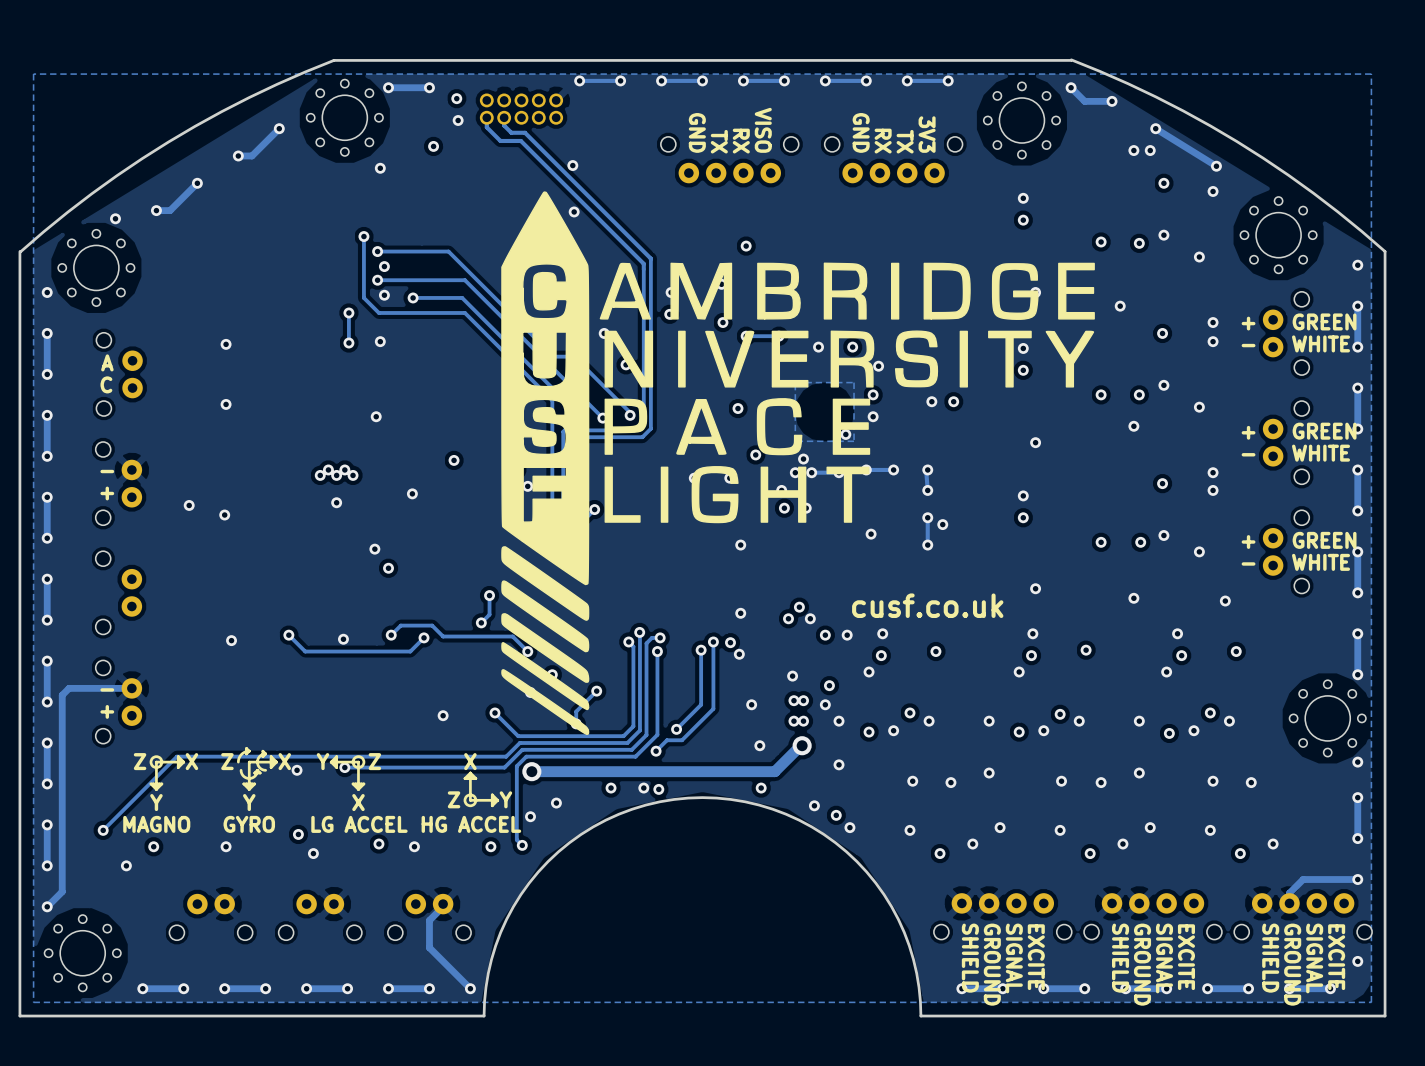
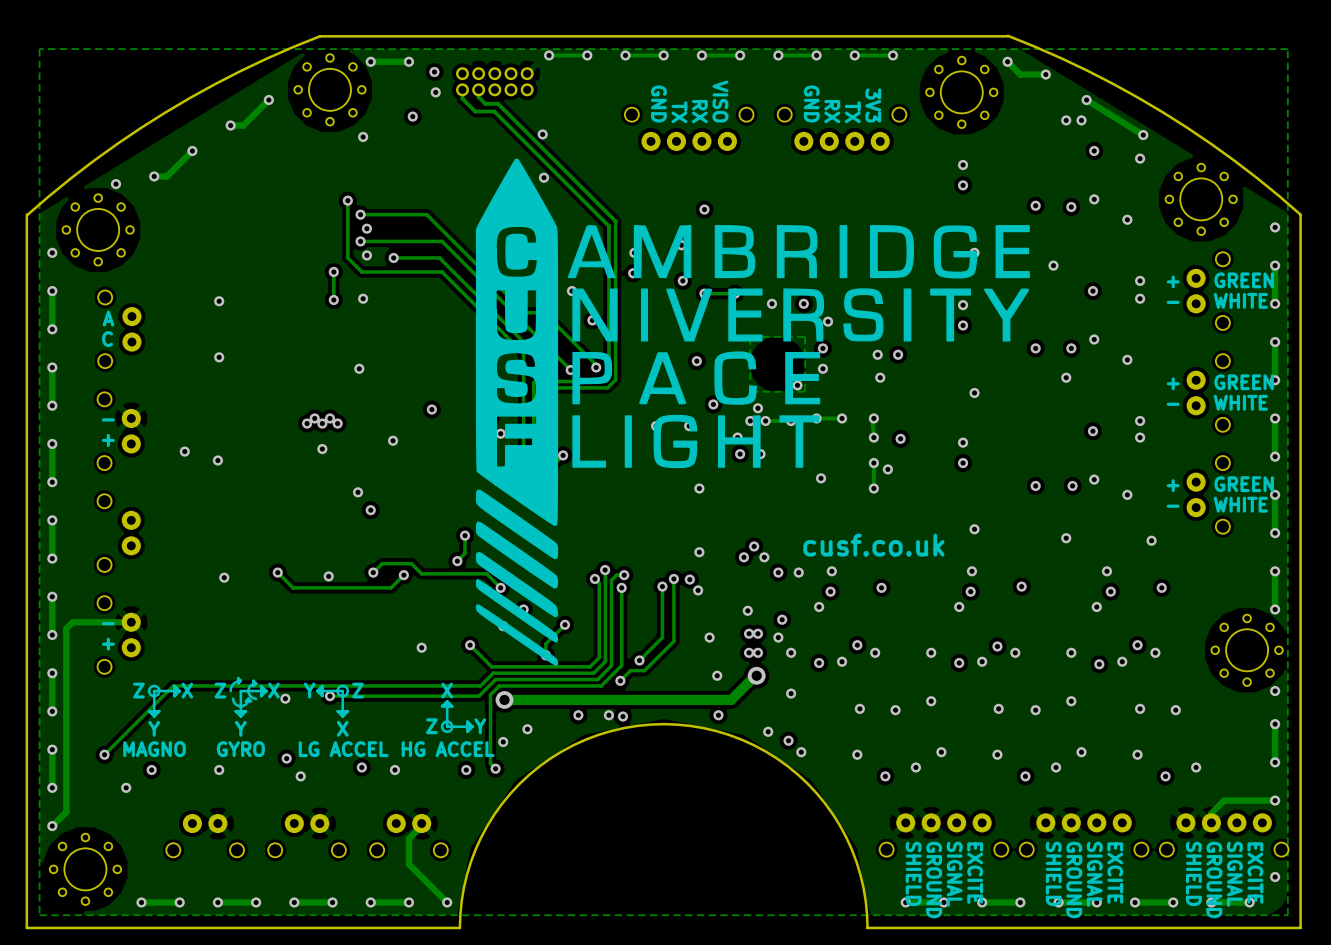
via: none -> (880, 377)
via: none -> (900, 438)

